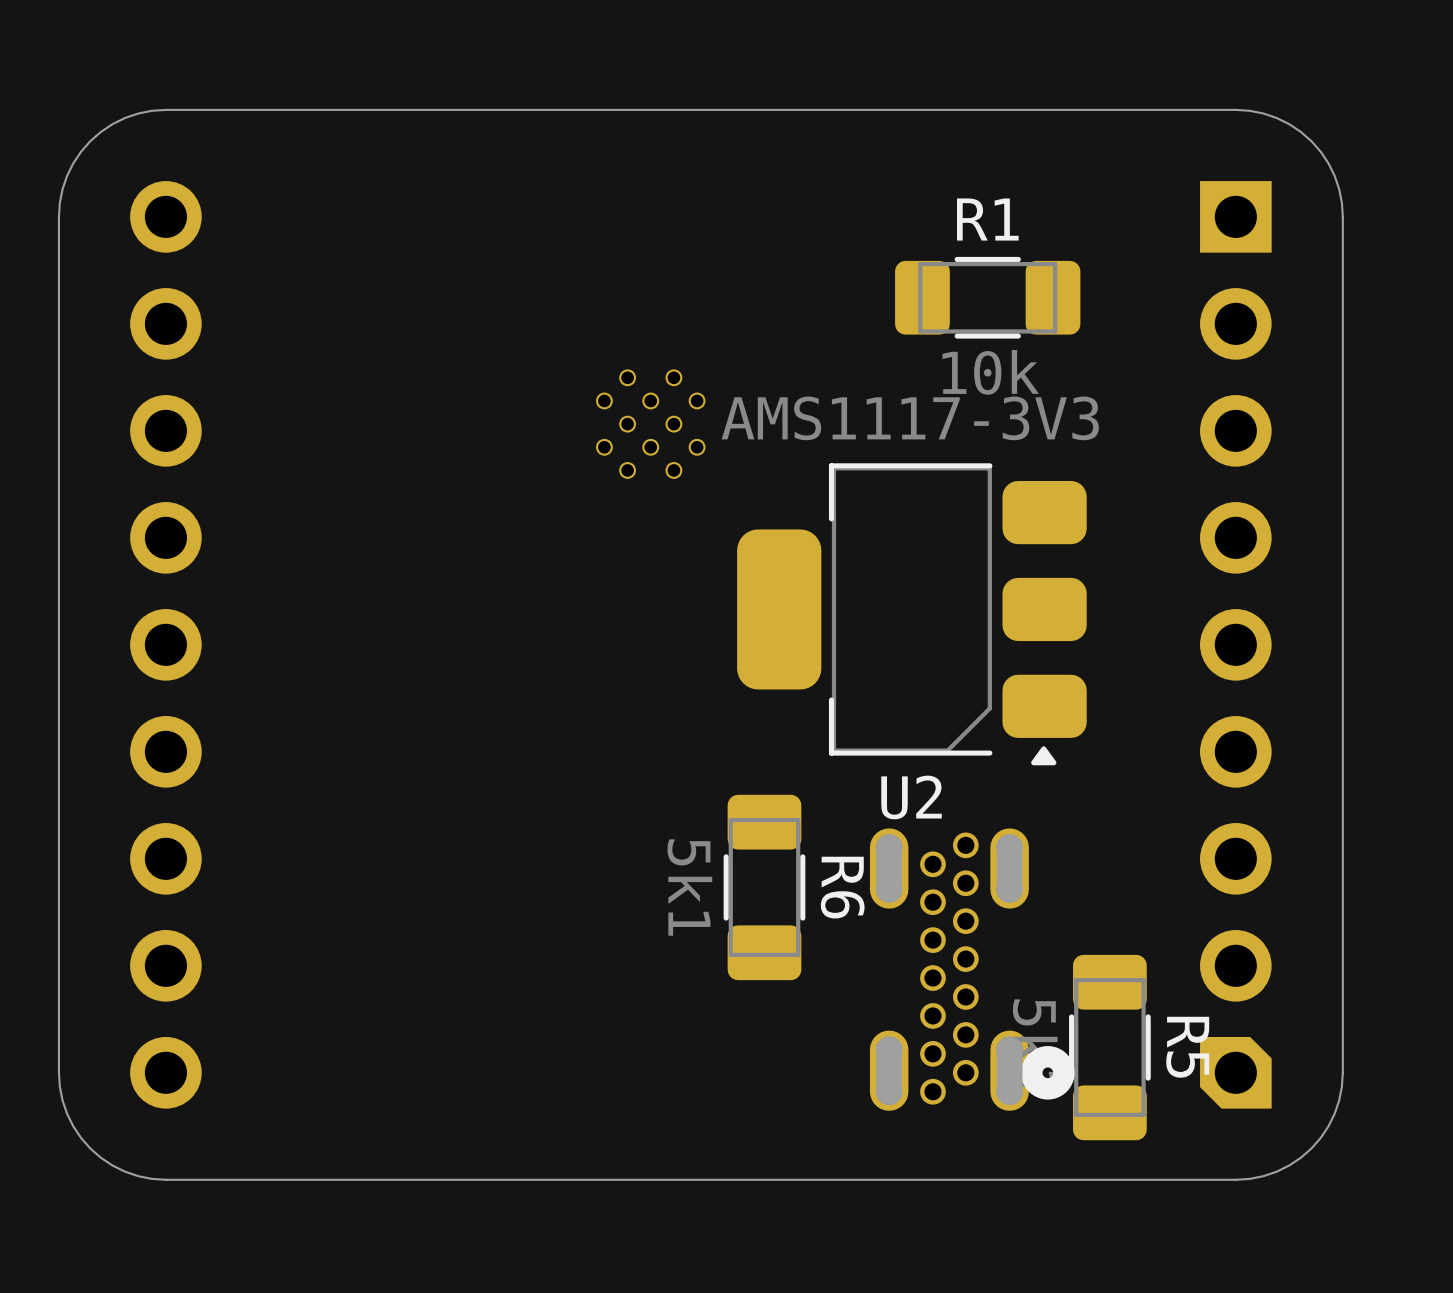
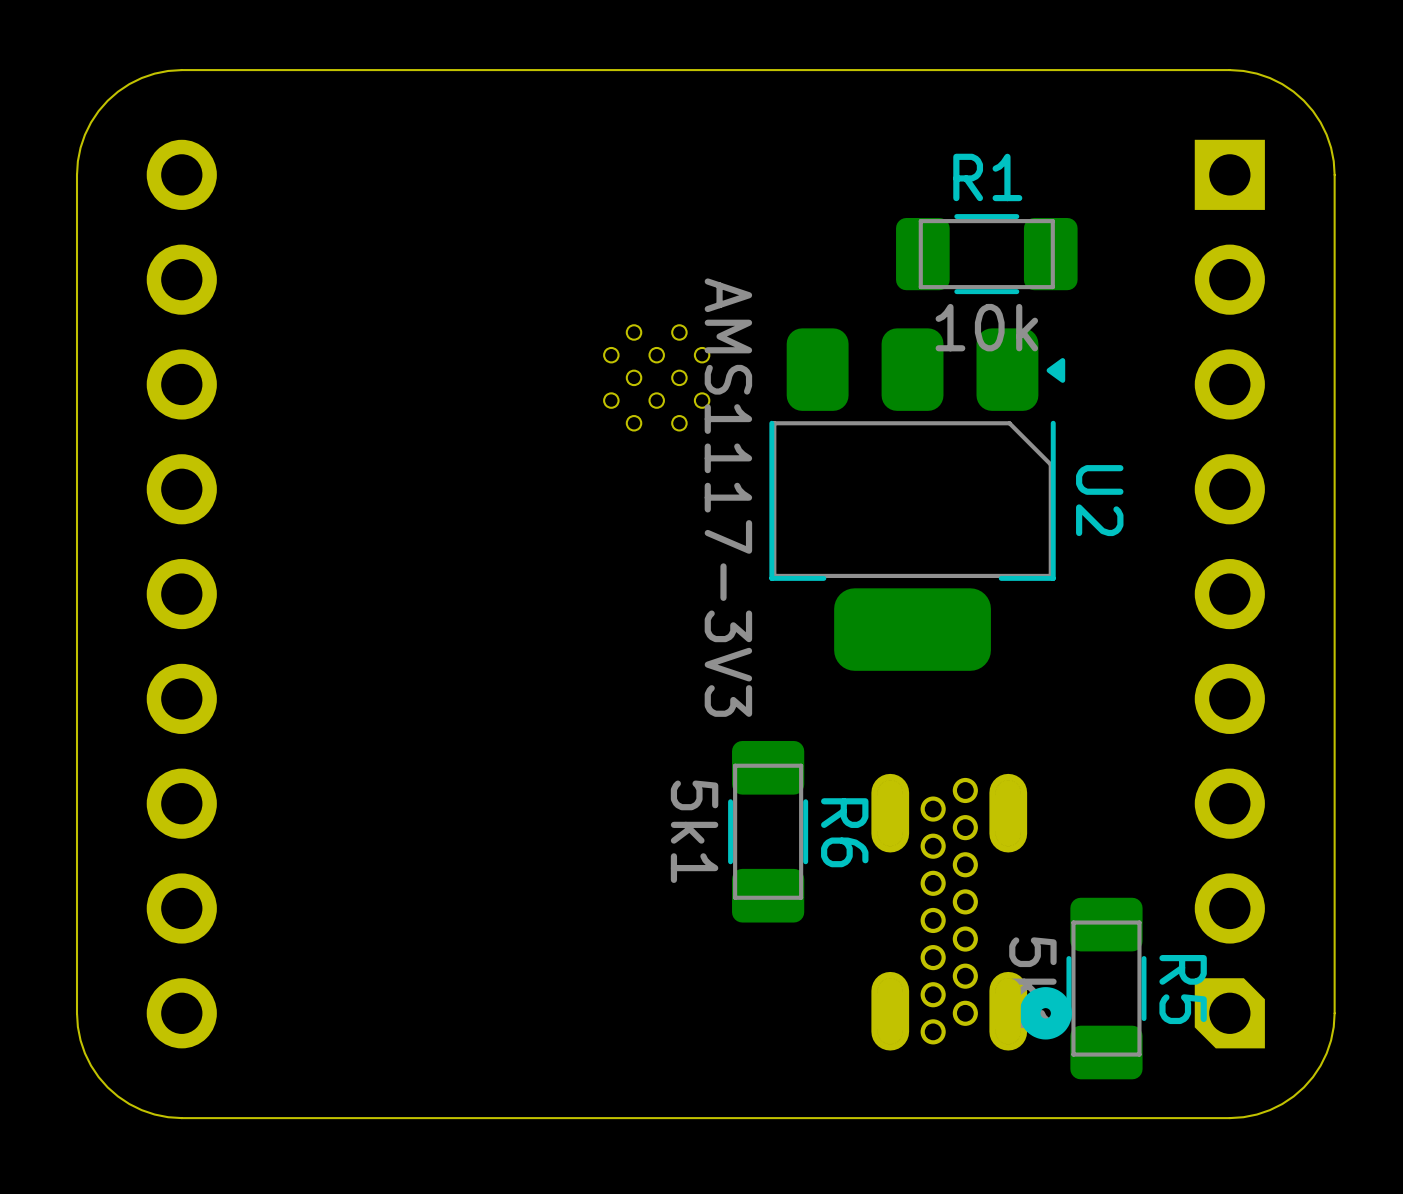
U2 rotation: 0° (911, 614) -> 90° counterclockwise (917, 499)

